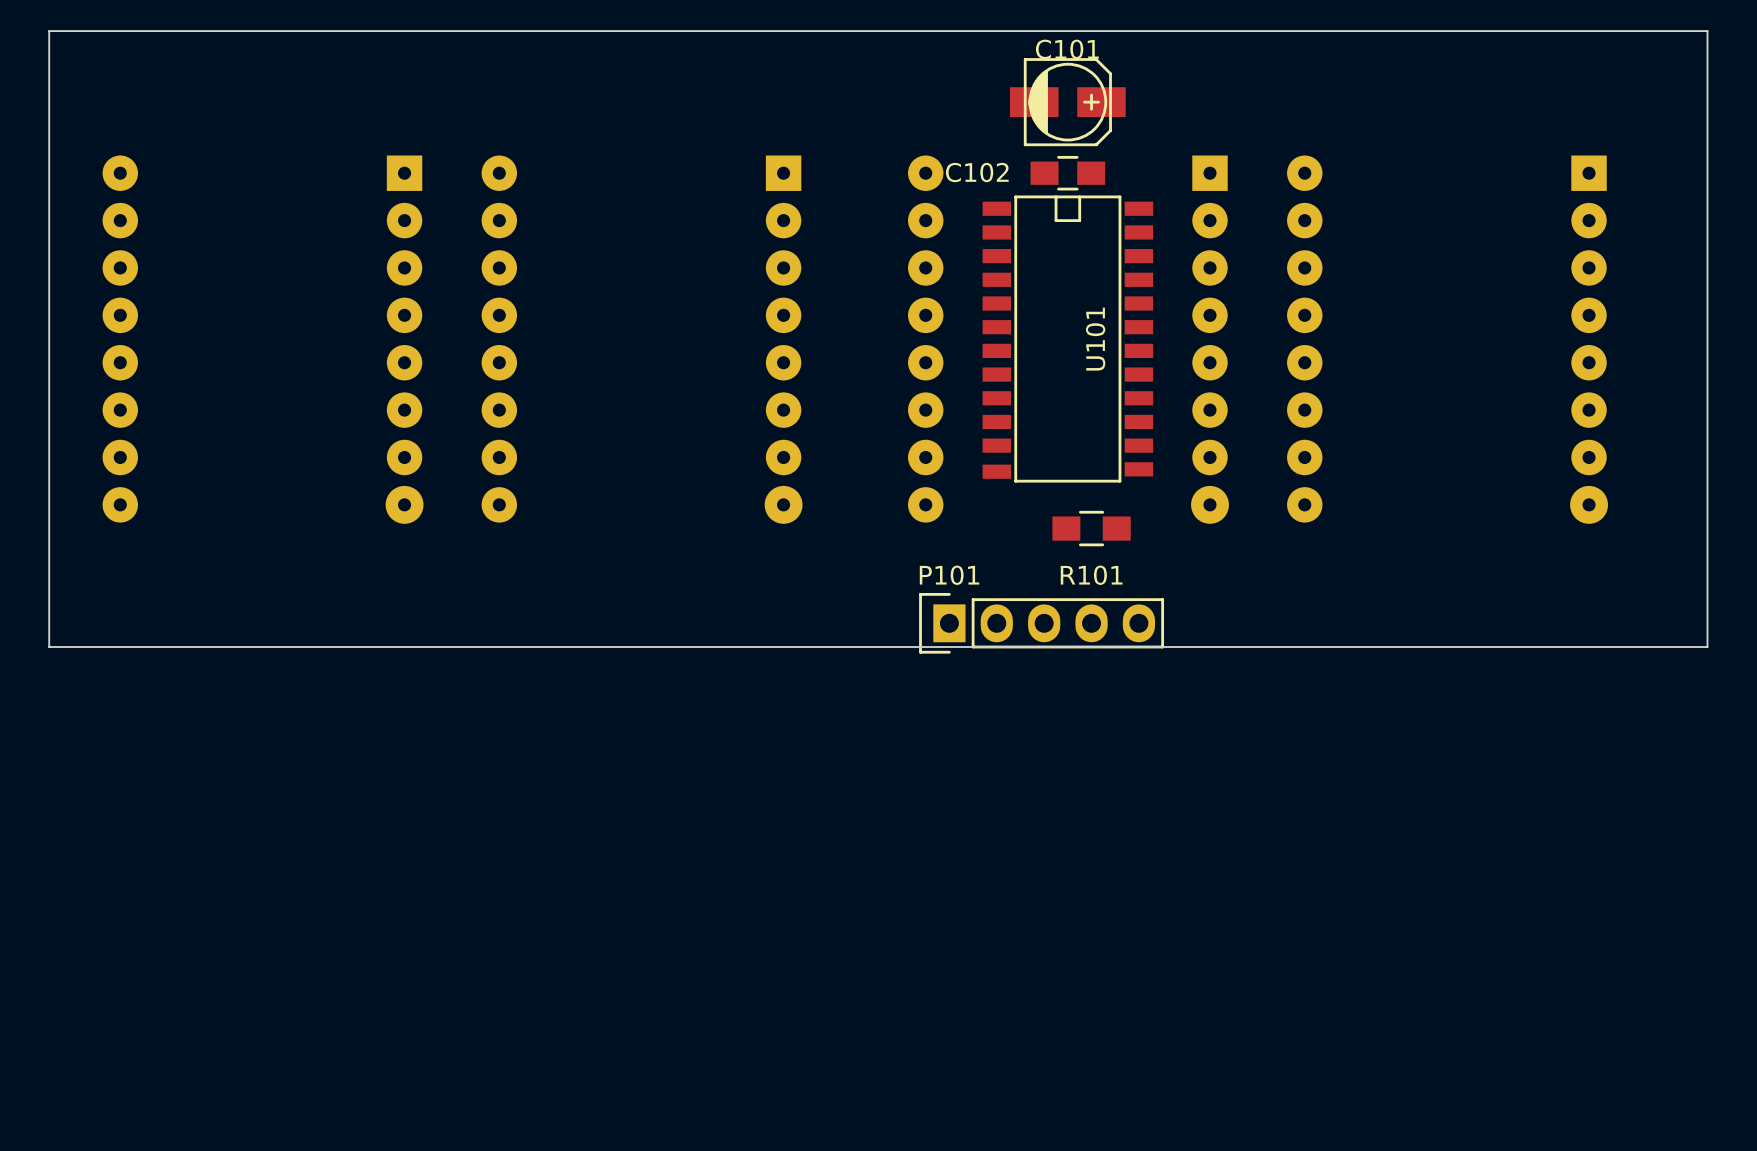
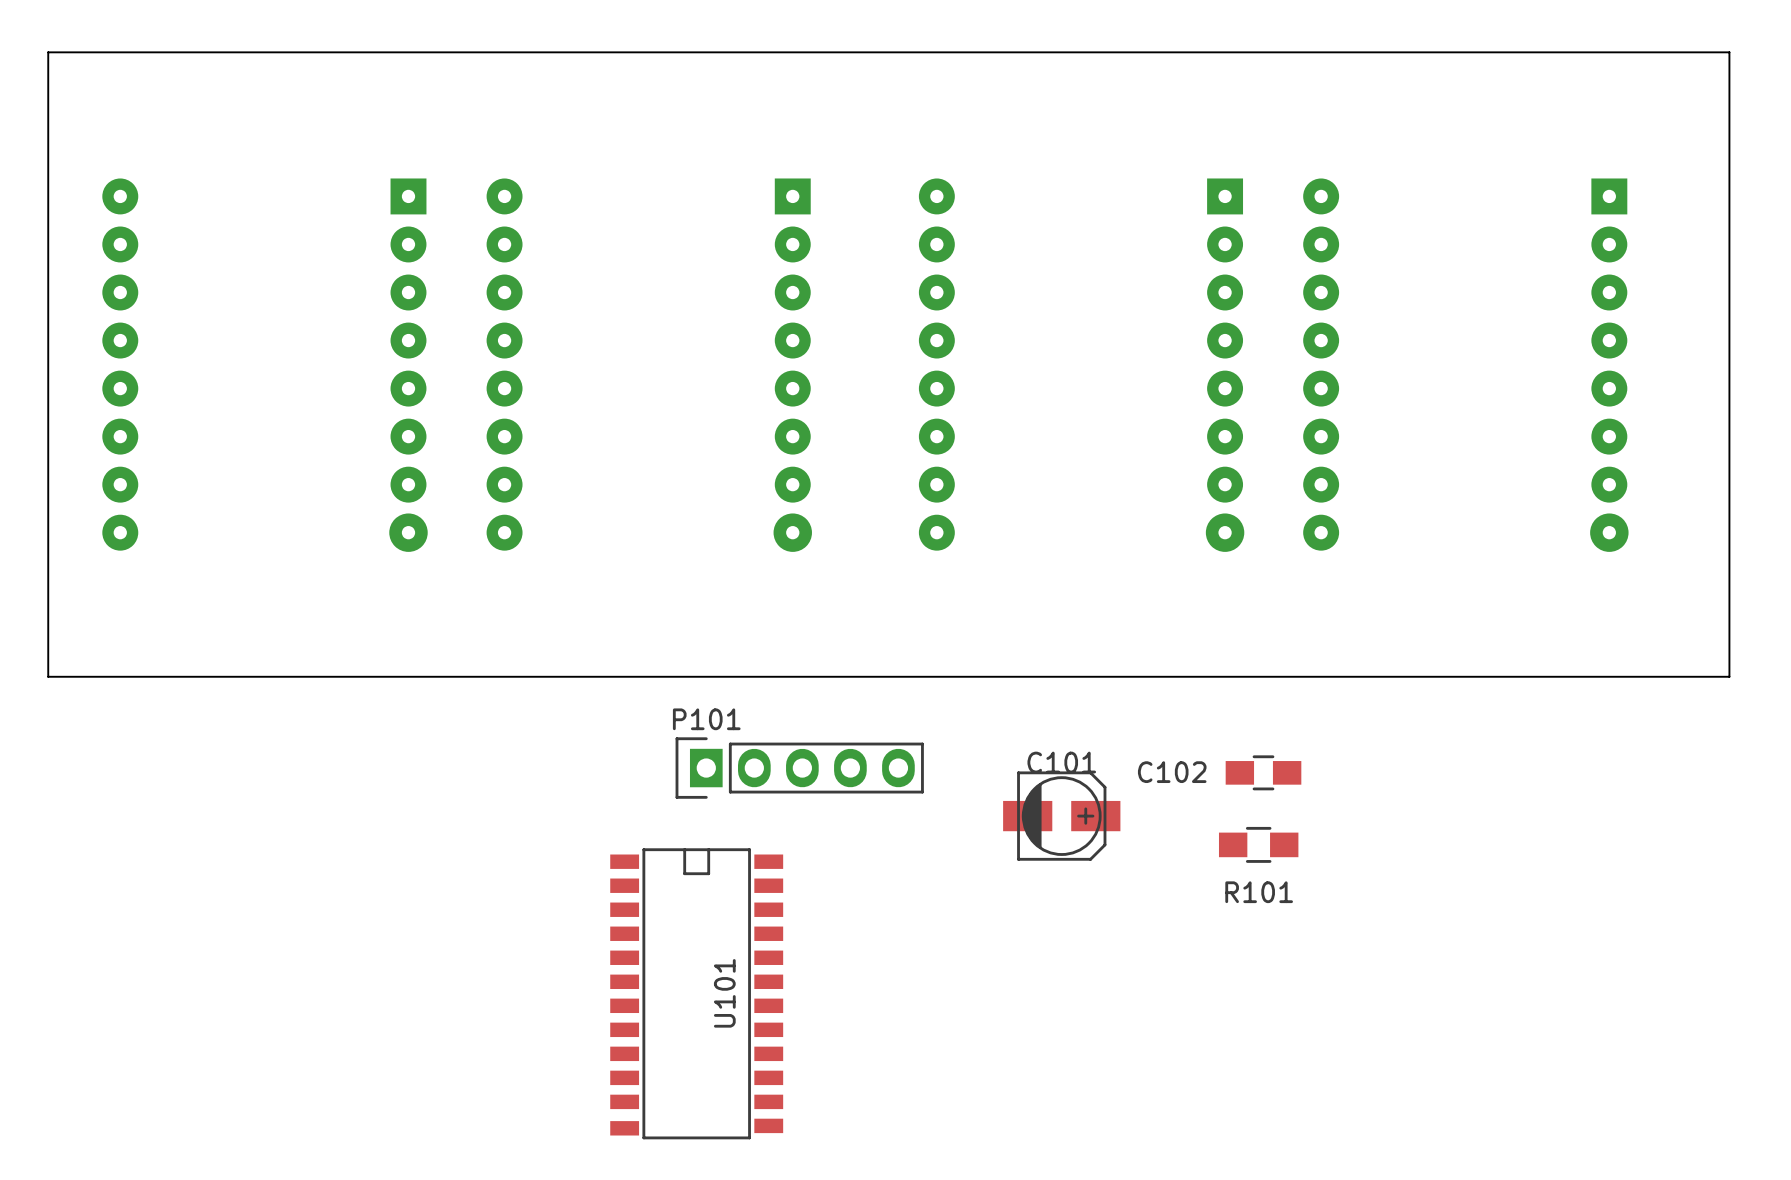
C101 position: (1067, 102) -> (1061, 816)
C102 position: (1067, 173) -> (1263, 772)
U101 position: (1067, 339) -> (696, 993)
R101 position: (1091, 528) -> (1258, 844)
P101 position: (1041, 623) -> (799, 768)

